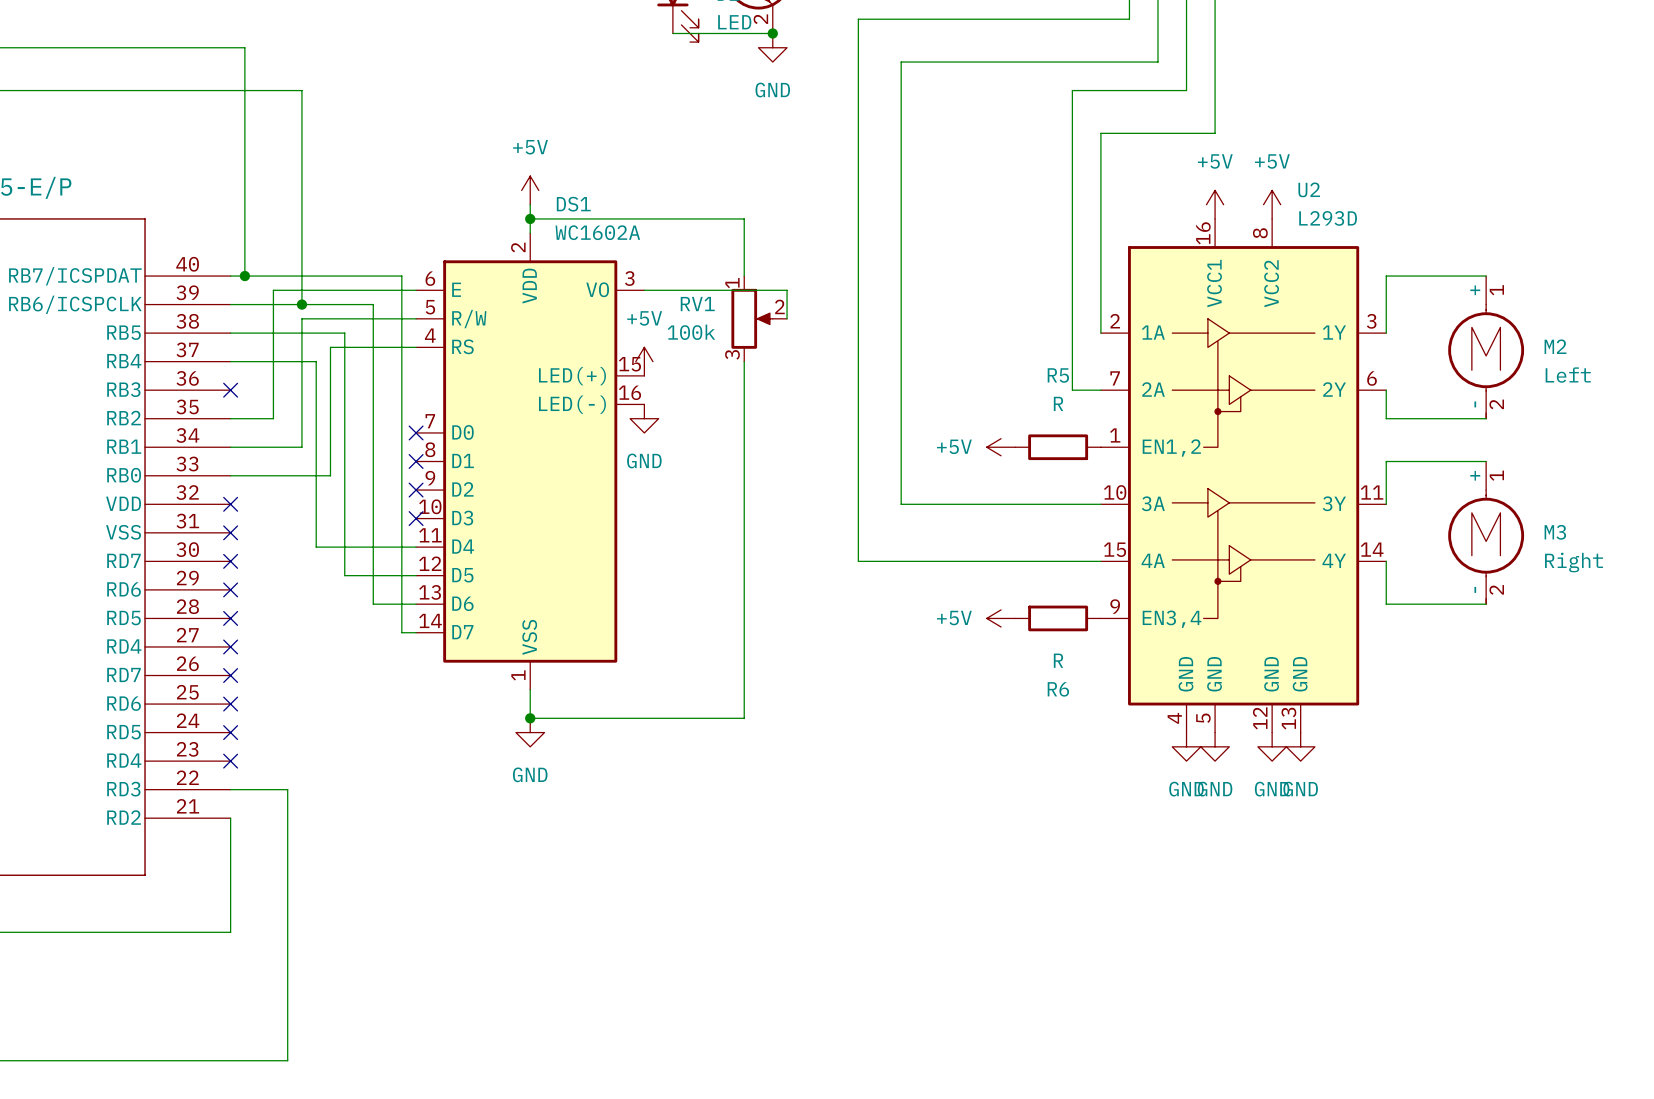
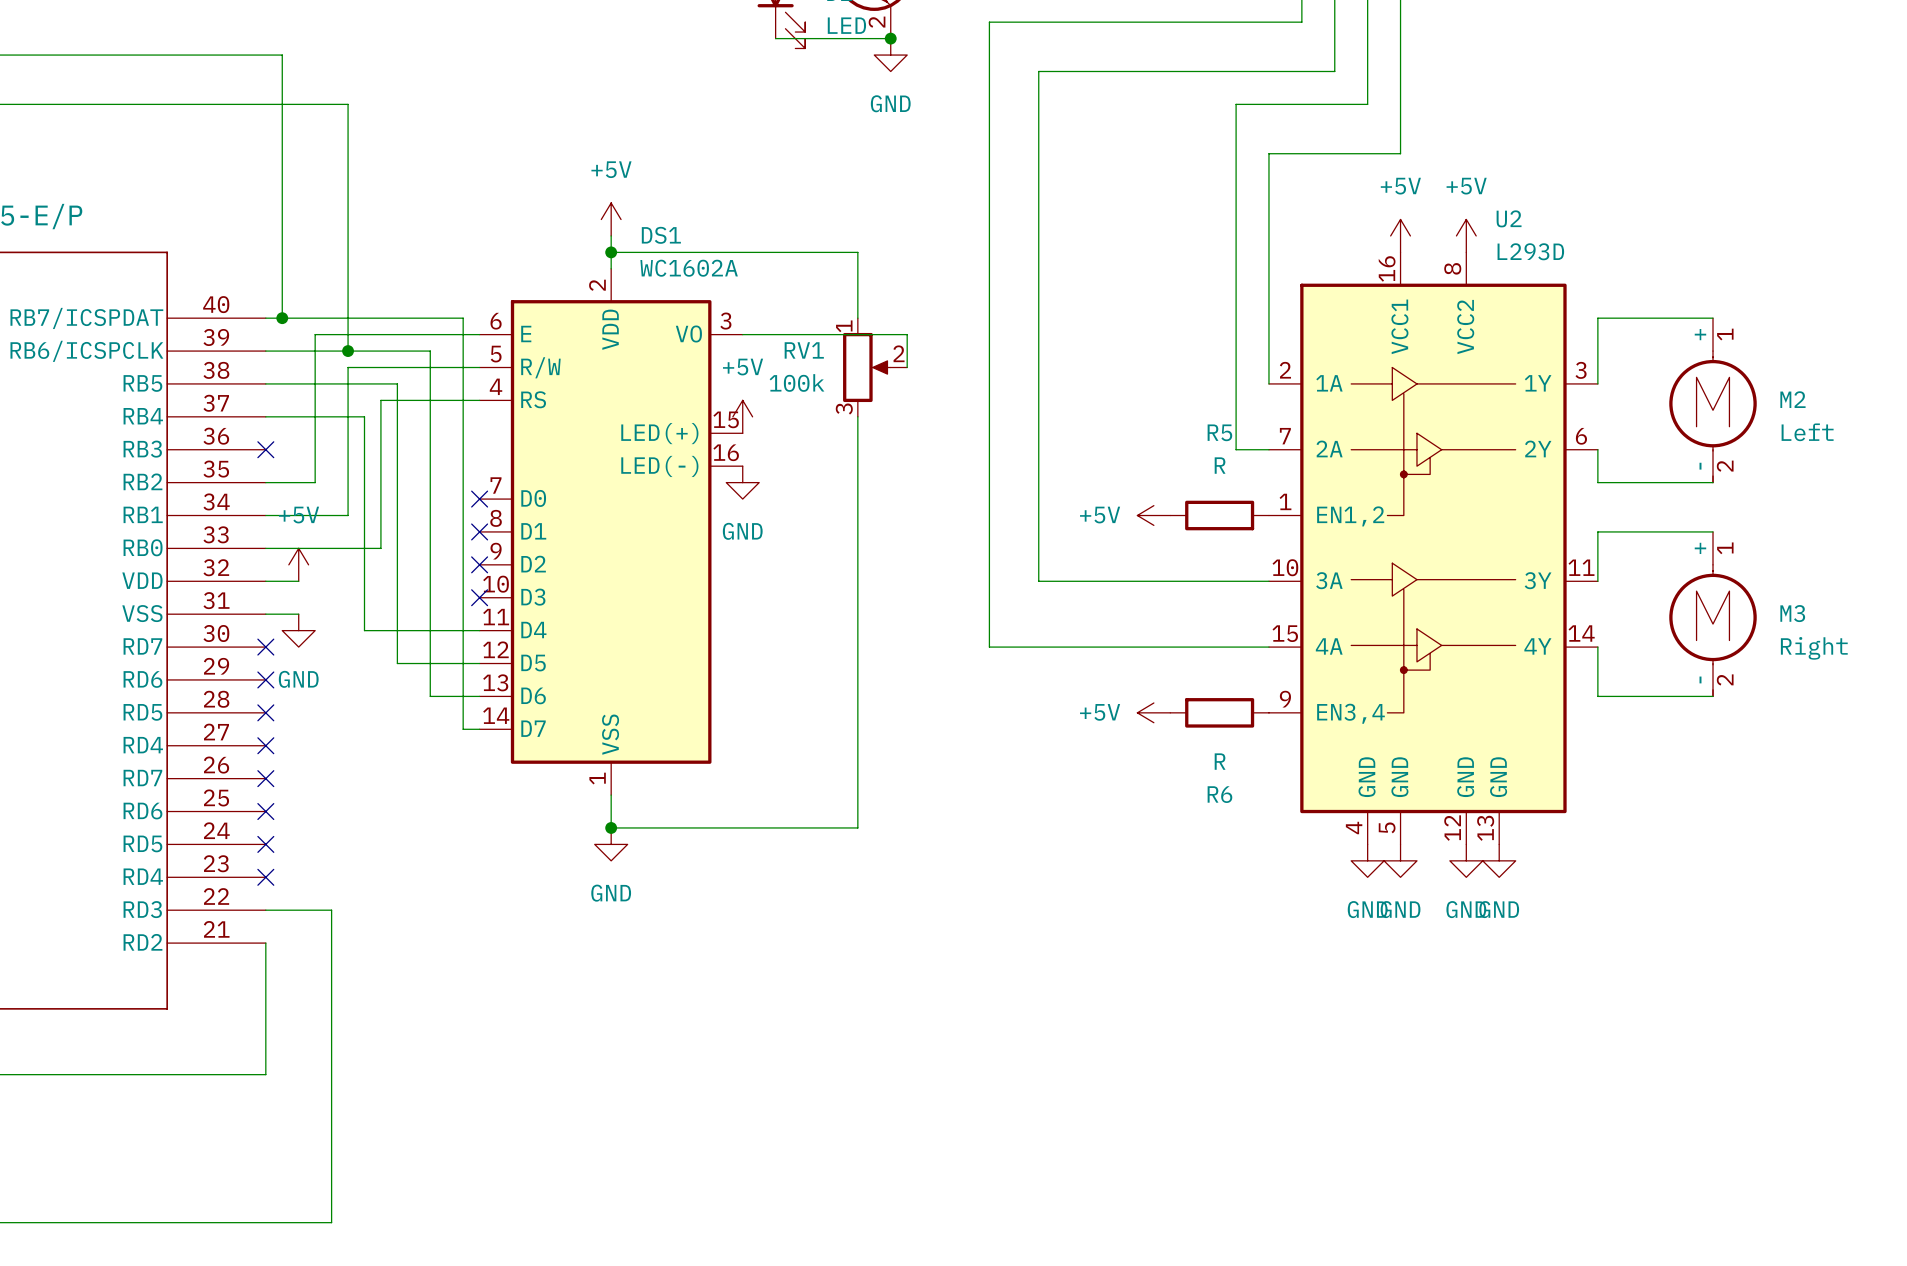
power symbol: none -> +5V (298, 564)
wire: none -> (265, 581) (298, 581)
no-connect mark: (230, 504) -> none
wire: none -> (265, 614) (298, 614)
no-connect mark: (230, 532) -> none
power symbol: none -> GND (298, 630)

